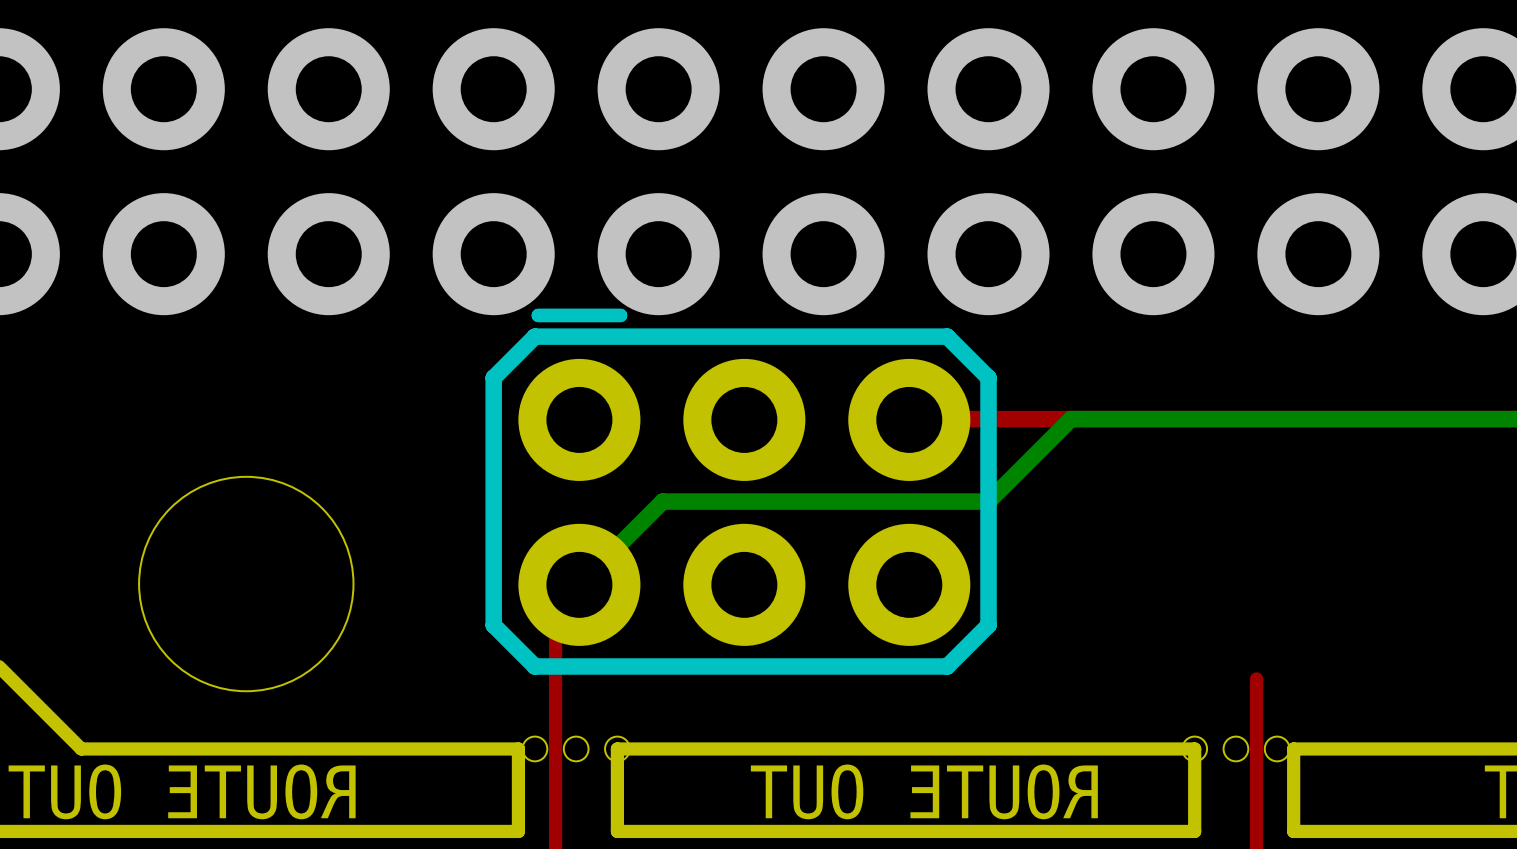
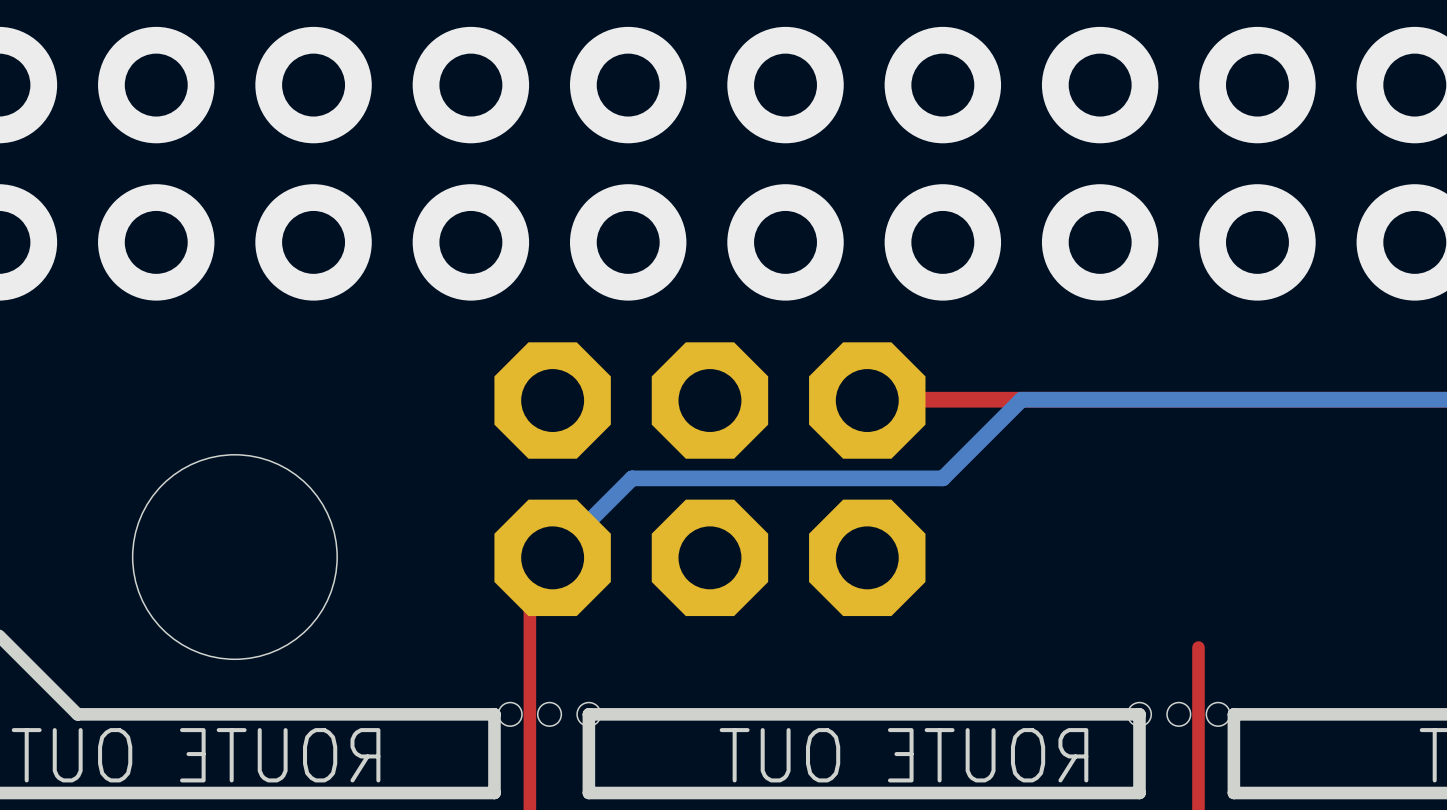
part footprint: [518, 309, 971, 646] -> [494, 342, 926, 617]
line: (947, 336) (534, 336) (493, 377) (493, 625) (534, 666) (947, 666) (988, 625) (988, 377) (947, 336) -> none

